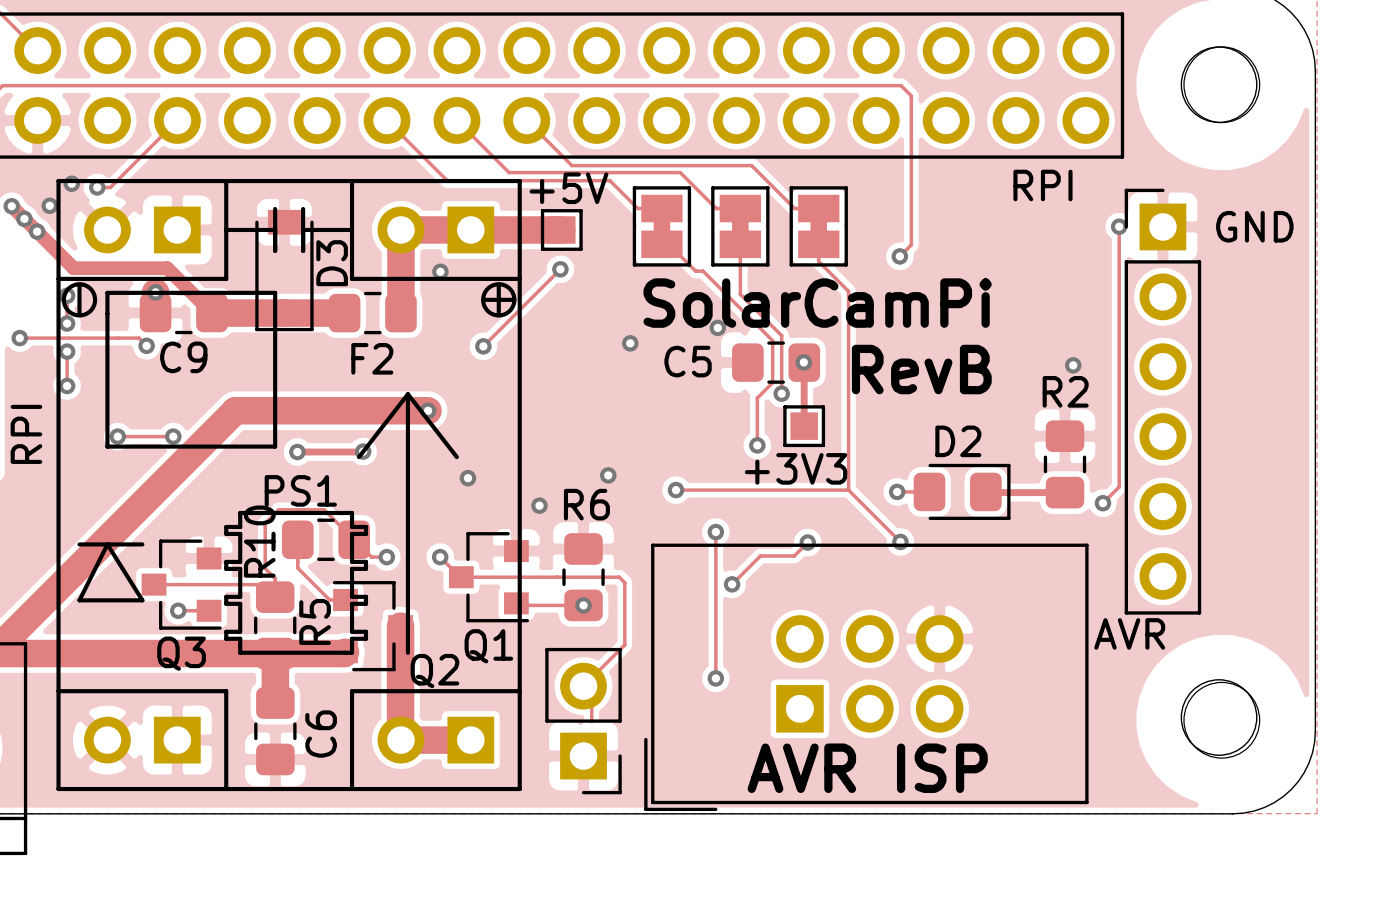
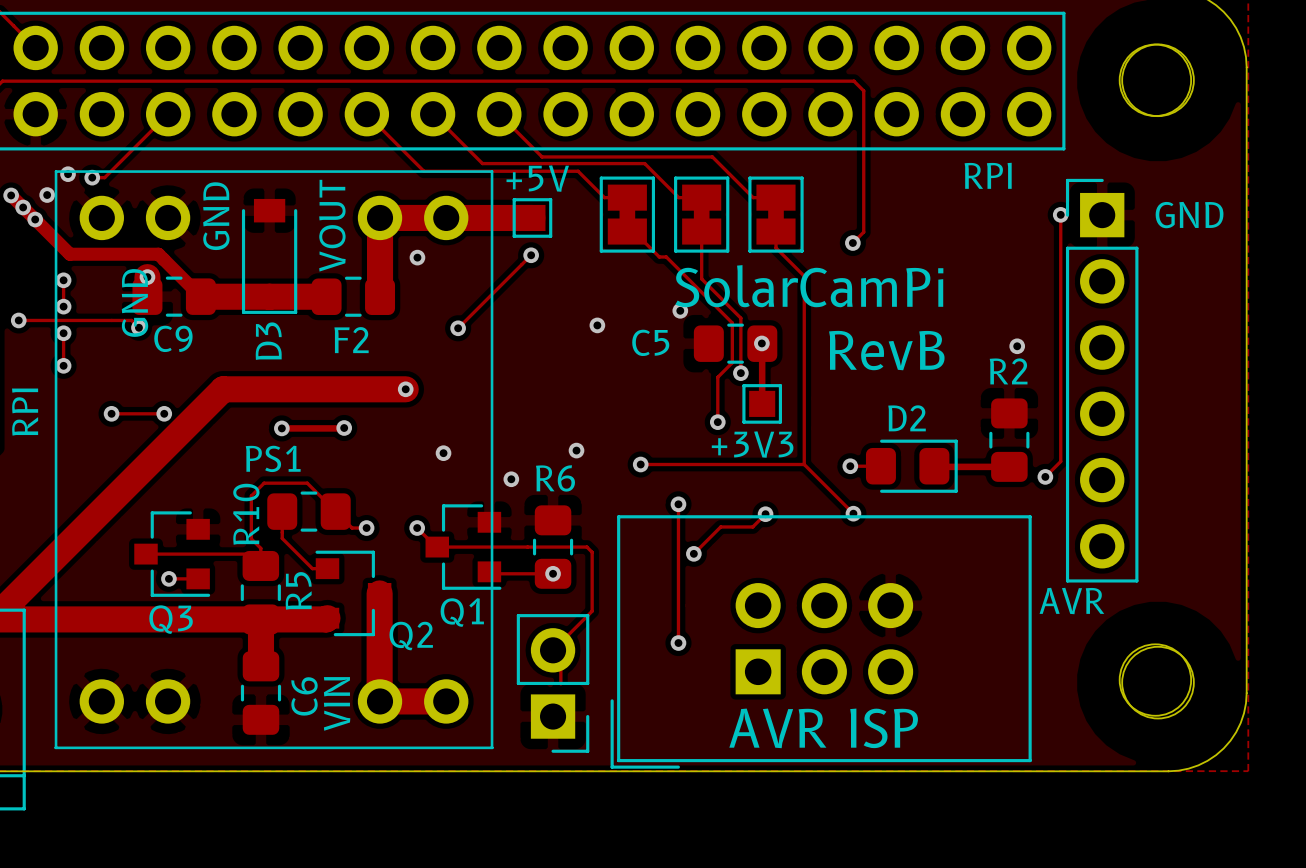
PS1 footprint: [56, 178, 522, 792] -> [54, 170, 494, 750]
D3 name position: D3 (332, 263) -> D3 (268, 341)

